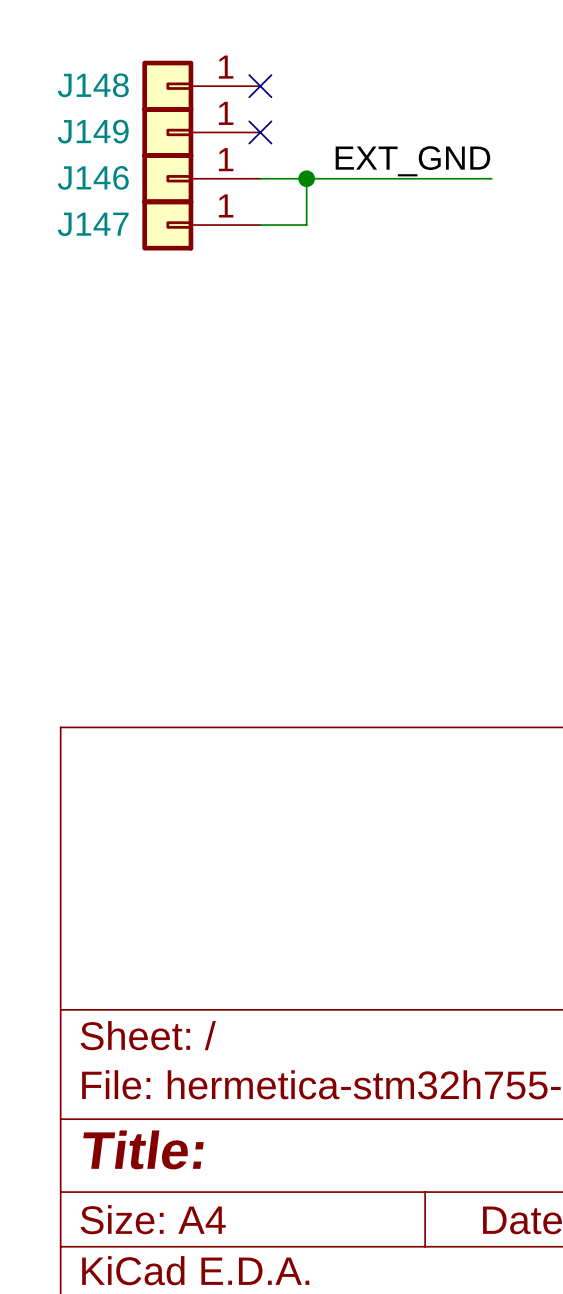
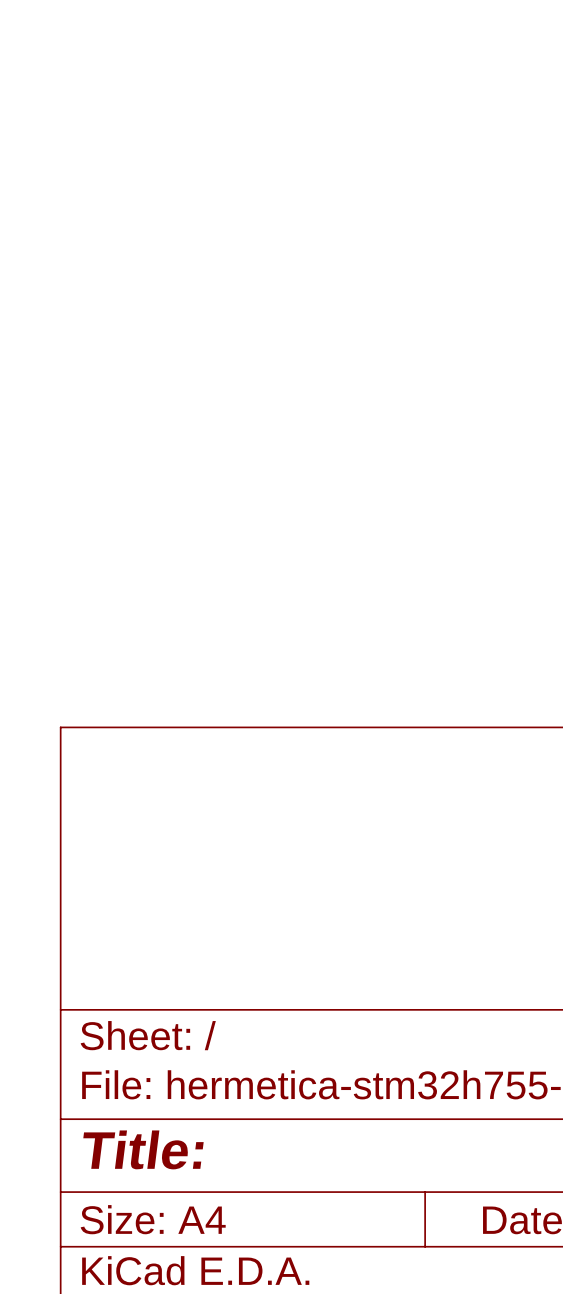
J148: (201, 86) -> none
no-connect mark: (260, 86) -> none
J149: (201, 132) -> none
no-connect mark: (260, 132) -> none
label: EXT_GND (412, 161) -> none
J146: (201, 178) -> none
wire: (260, 178) (491, 178) -> none
wire: (306, 178) (306, 225) (260, 225) -> none
junction: (306, 178) -> none
J147: (201, 225) -> none

